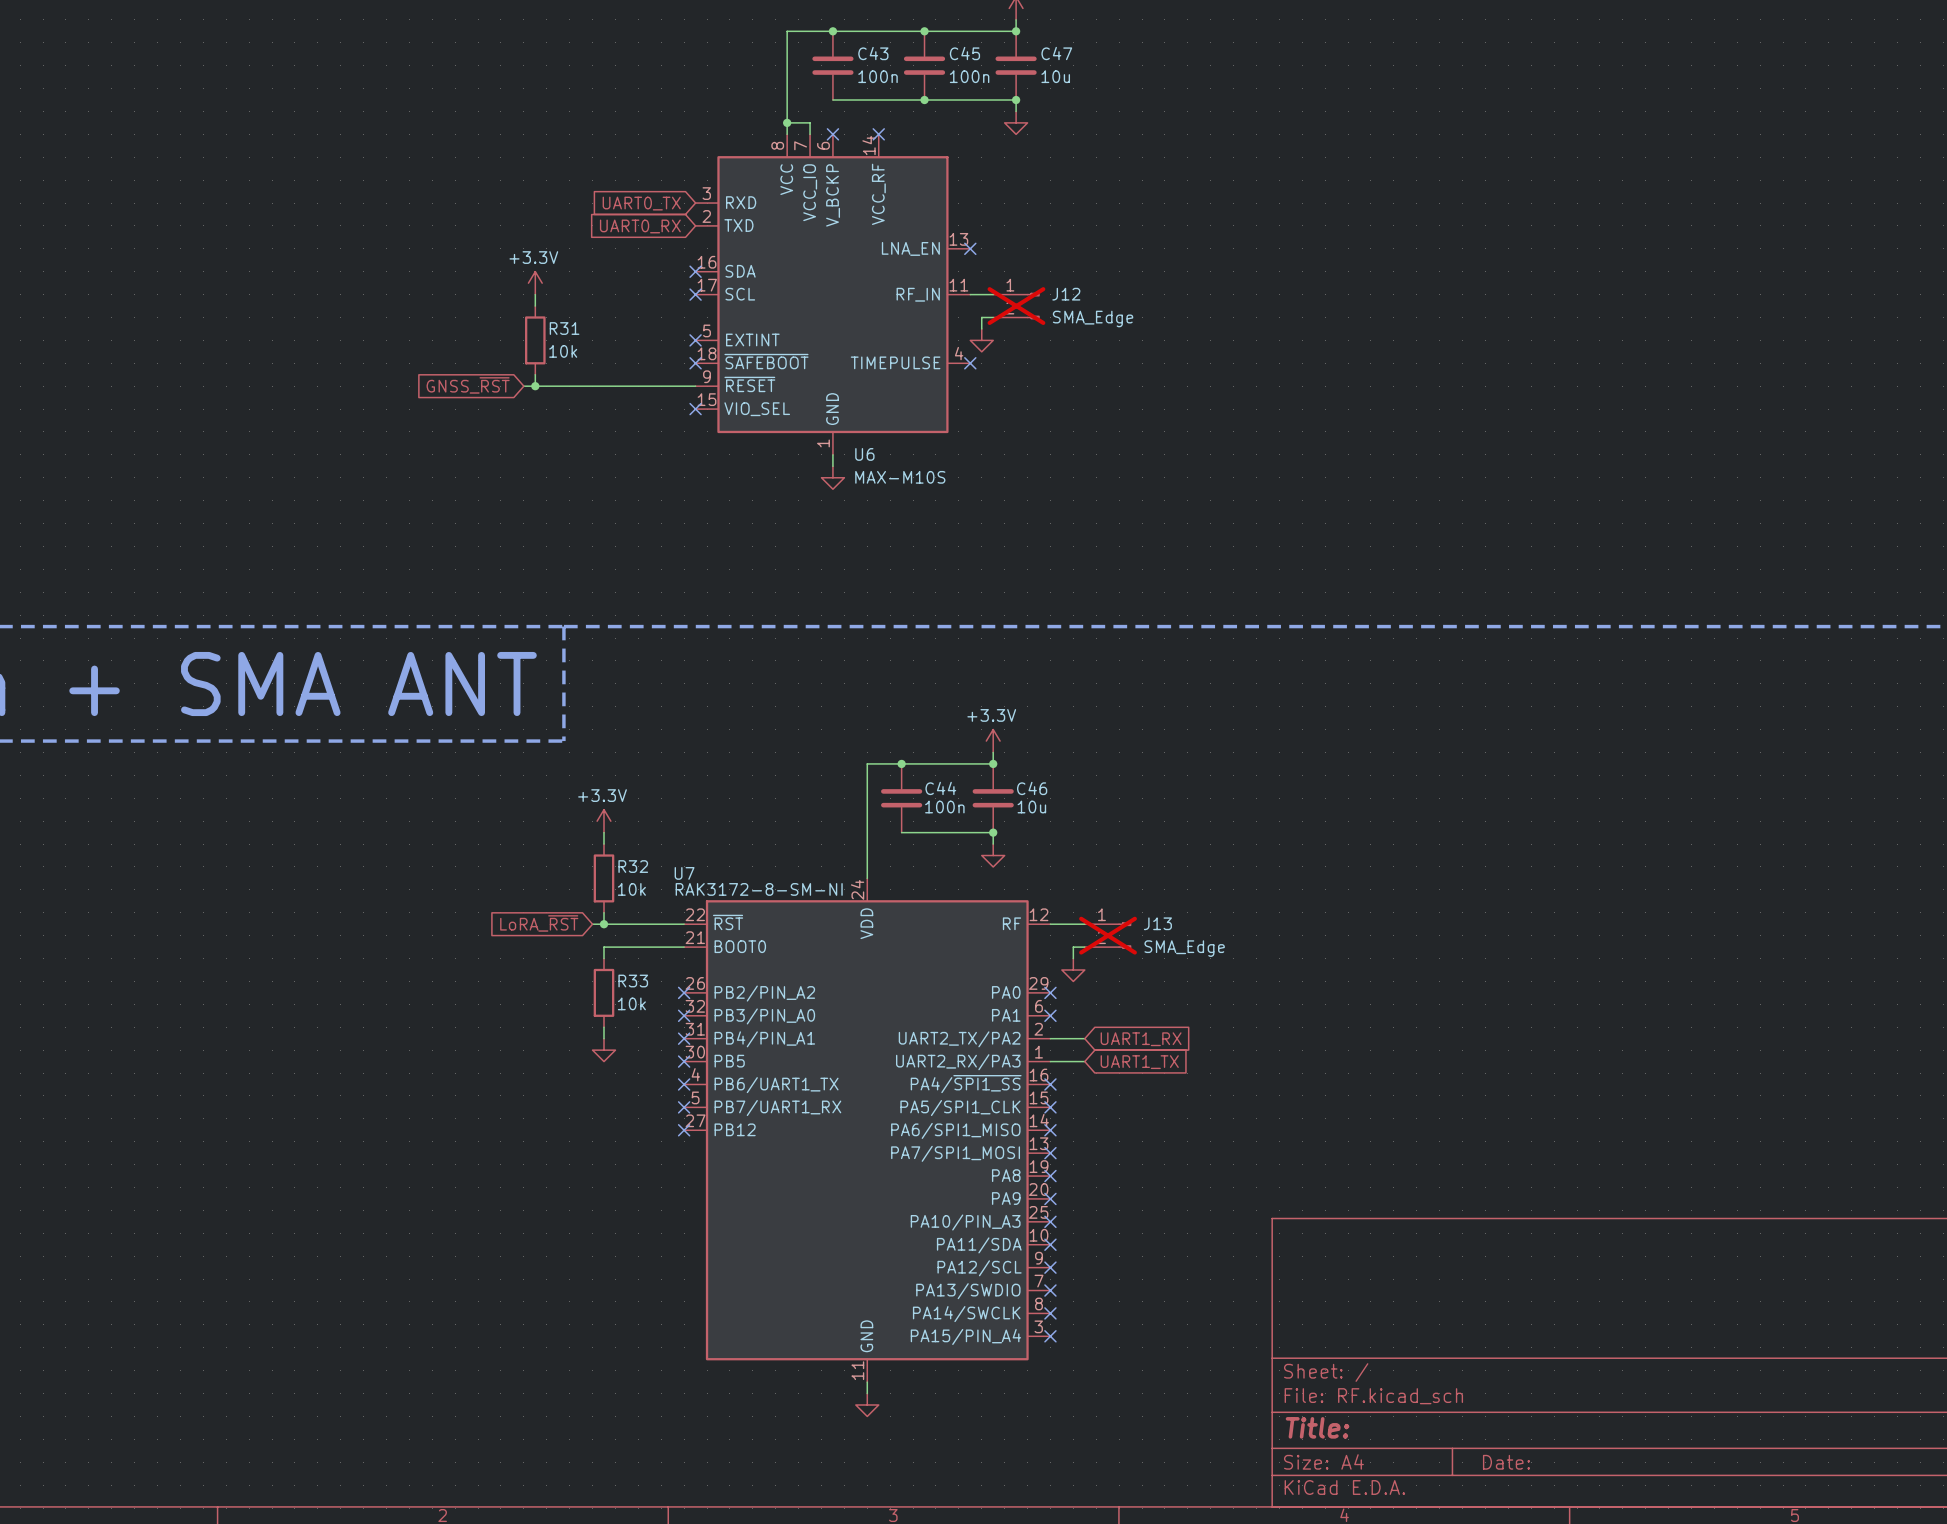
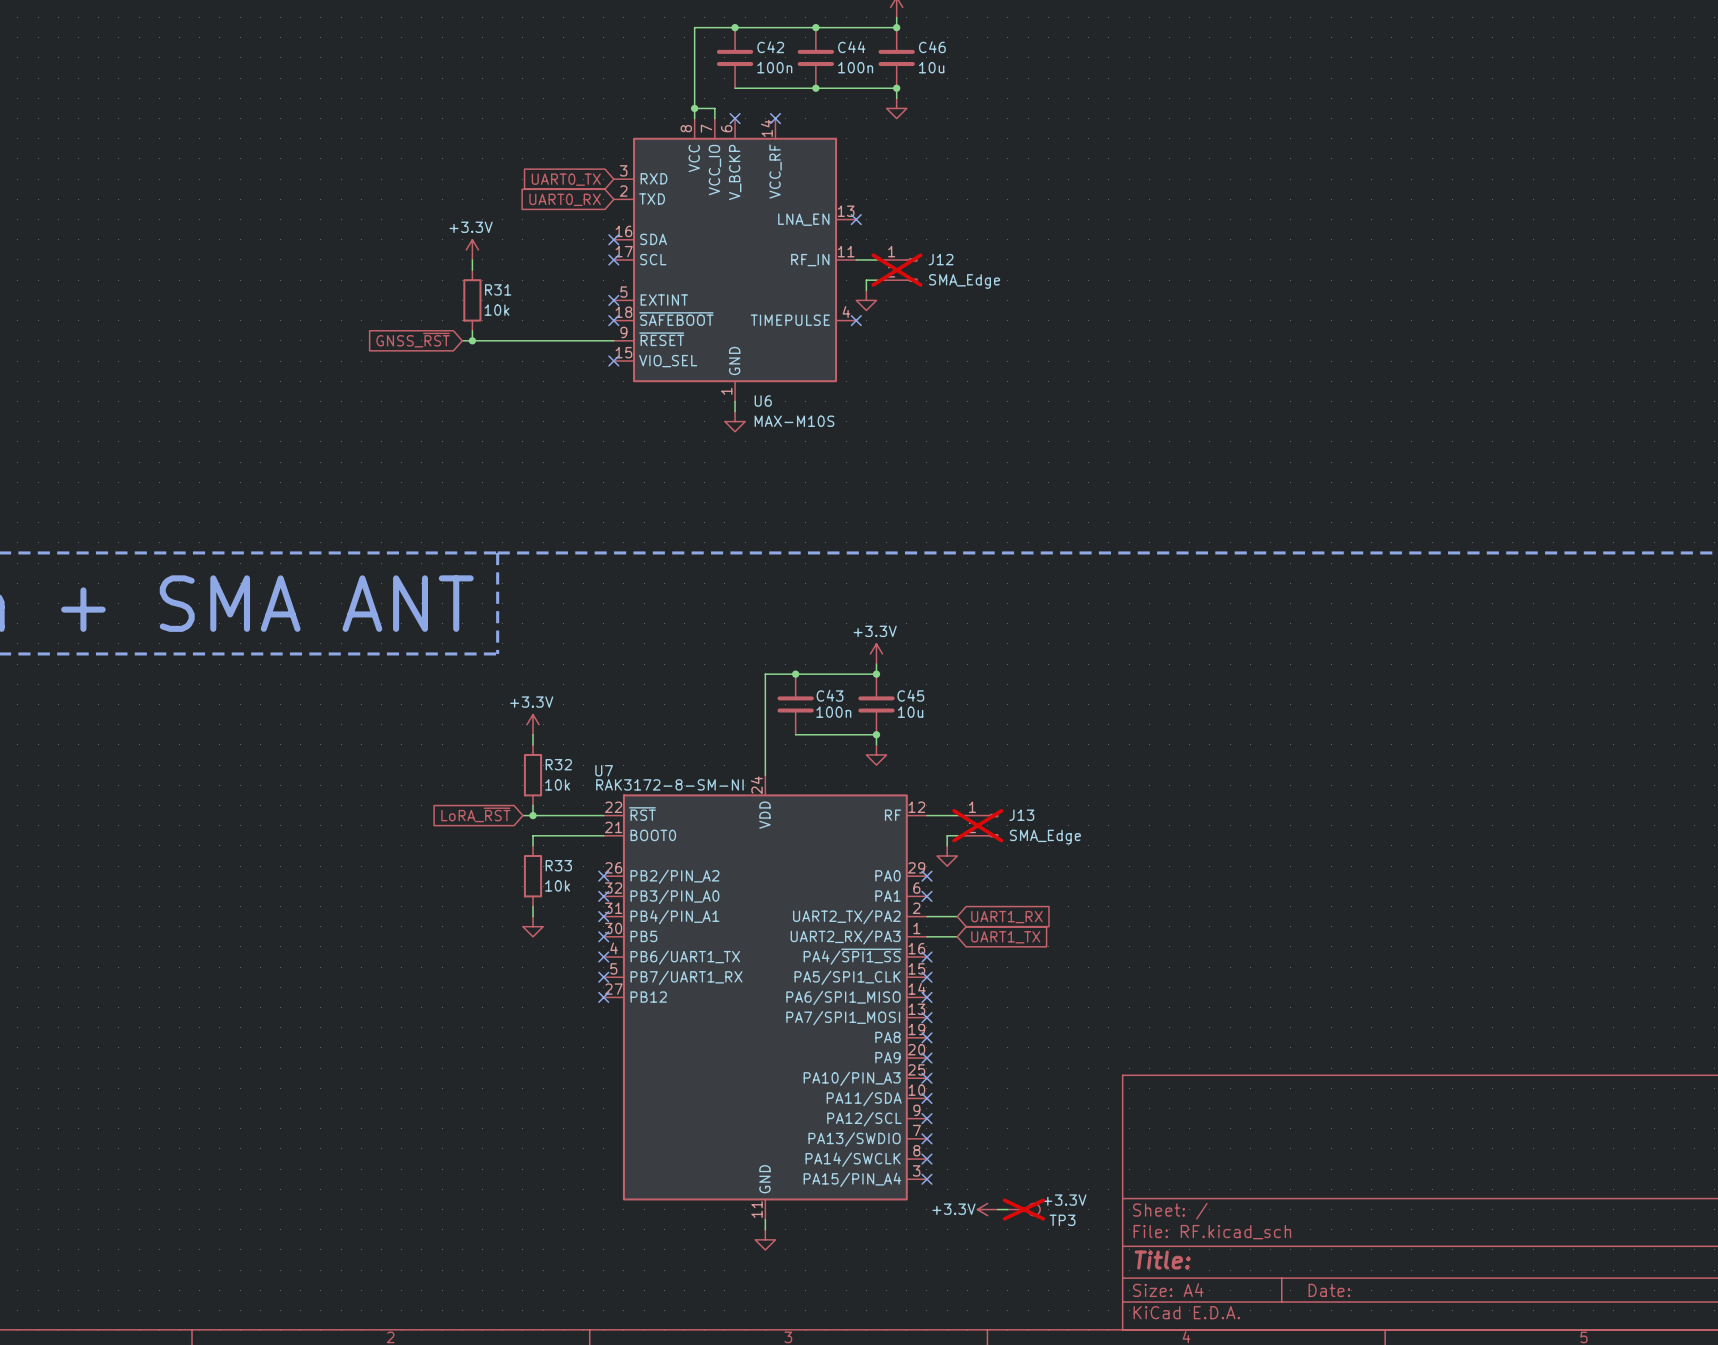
C43 name: C43 (873, 53) -> C42 (770, 47)
C45 name: C45 (964, 53) -> C44 (851, 47)
C47 name: C47 (1056, 53) -> C46 (932, 47)
C44 name: C44 (940, 788) -> C43 (830, 695)
C46 name: C46 (1032, 788) -> C45 (910, 695)
power symbol: none -> +3.3V (987, 1209)
wire: none -> (997, 1209) (1007, 1209)
TP3: none -> +3.3V (1023, 1209)

